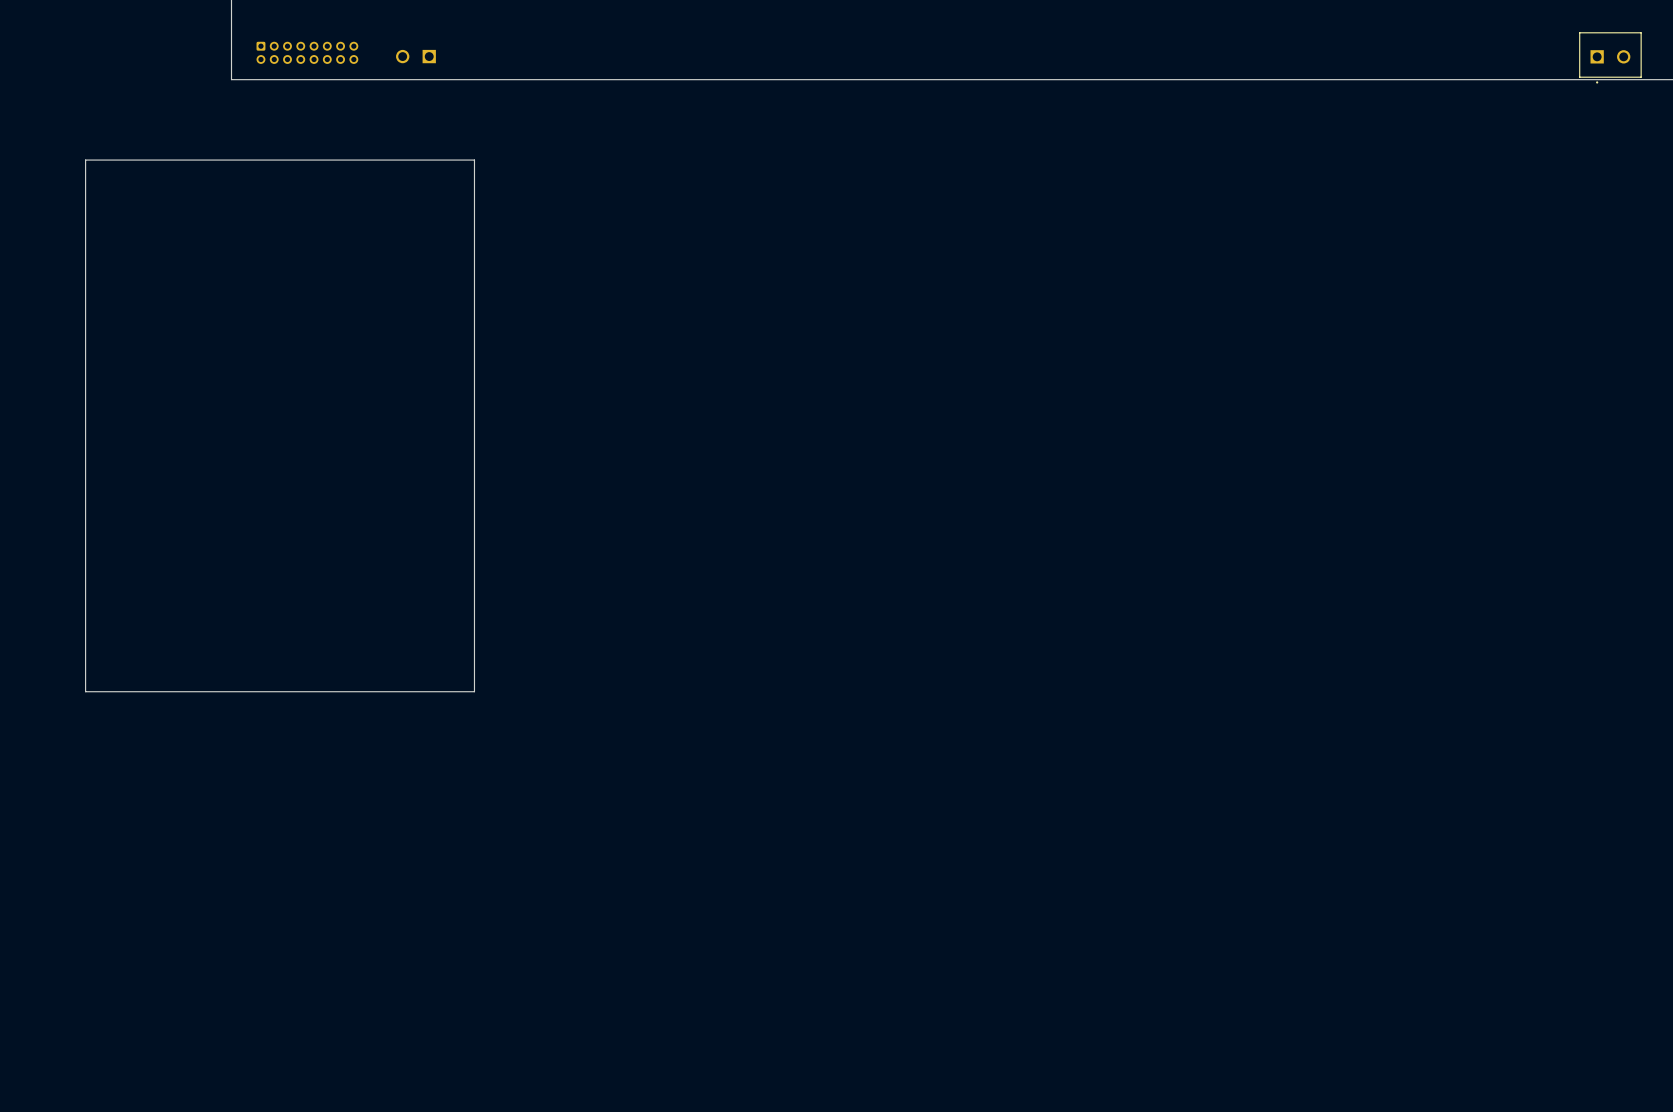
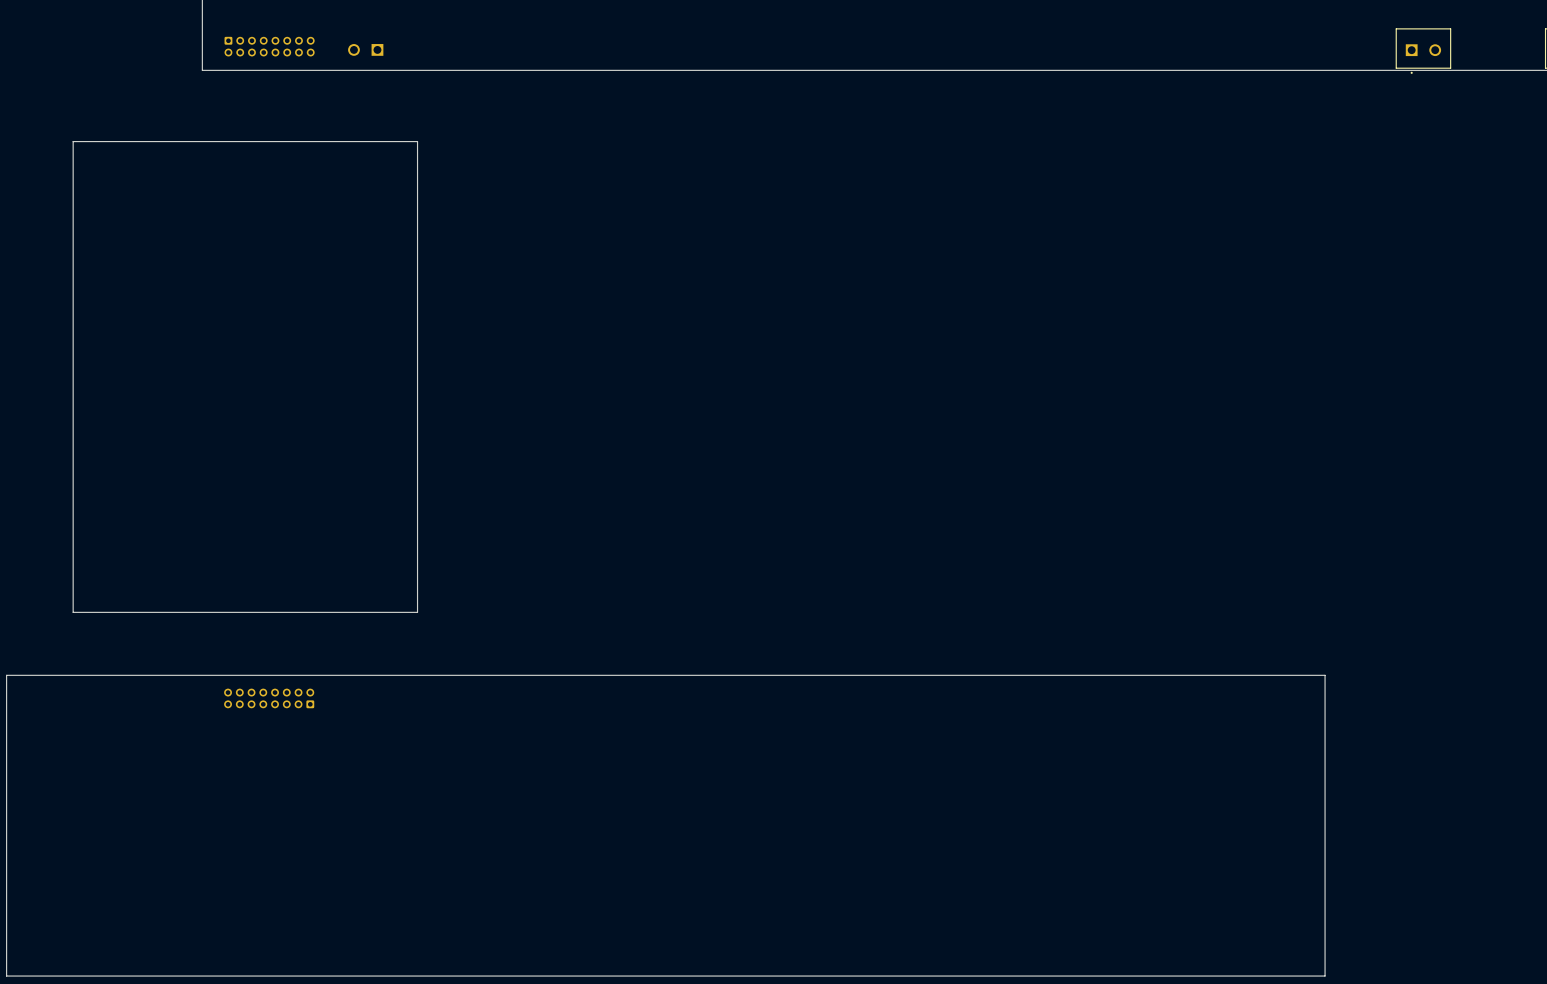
board edge: none -> (6, 675) (1325, 675) (1325, 976) (6, 976) (6, 675)
part: none -> (269, 698)

